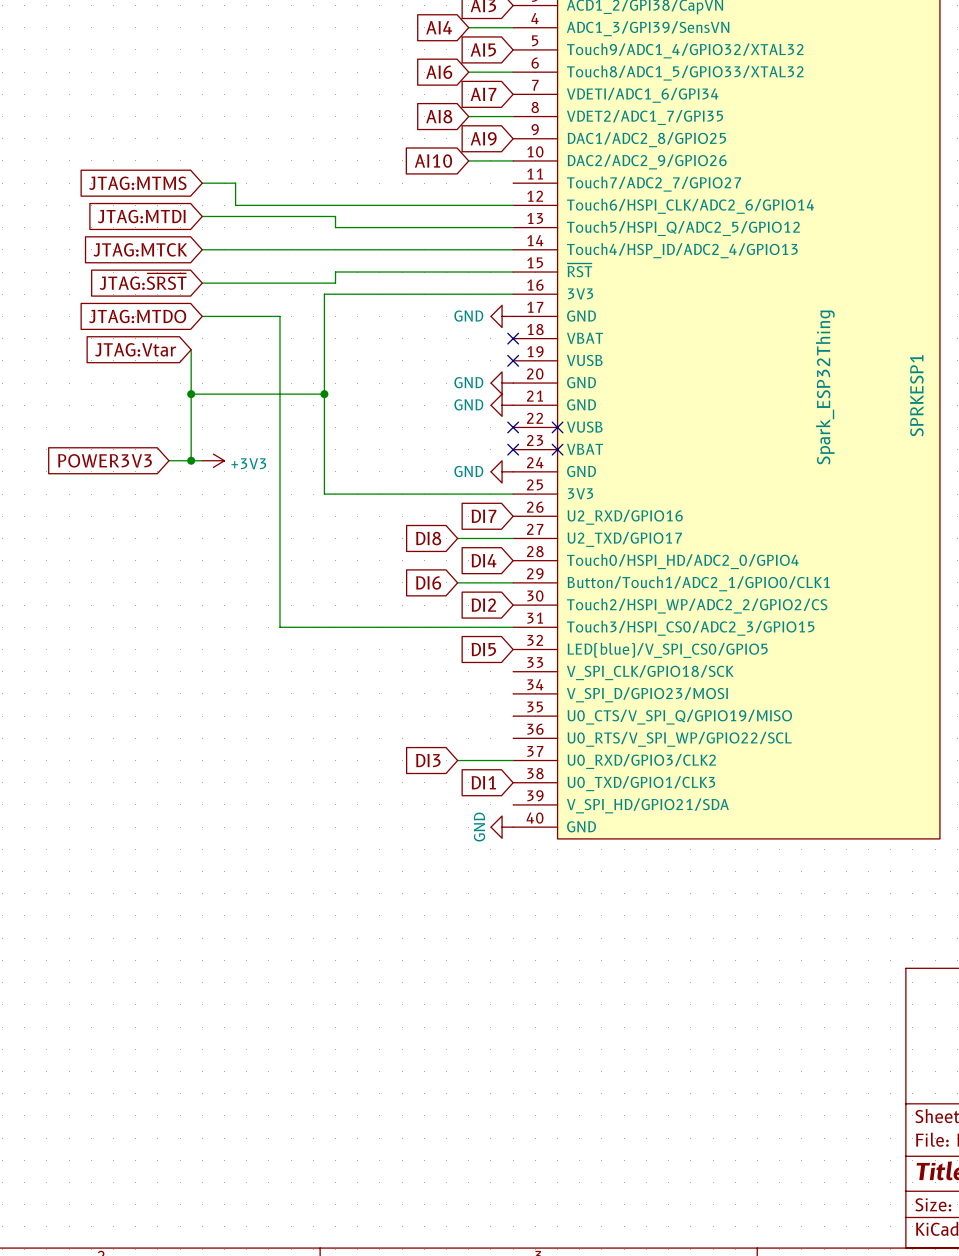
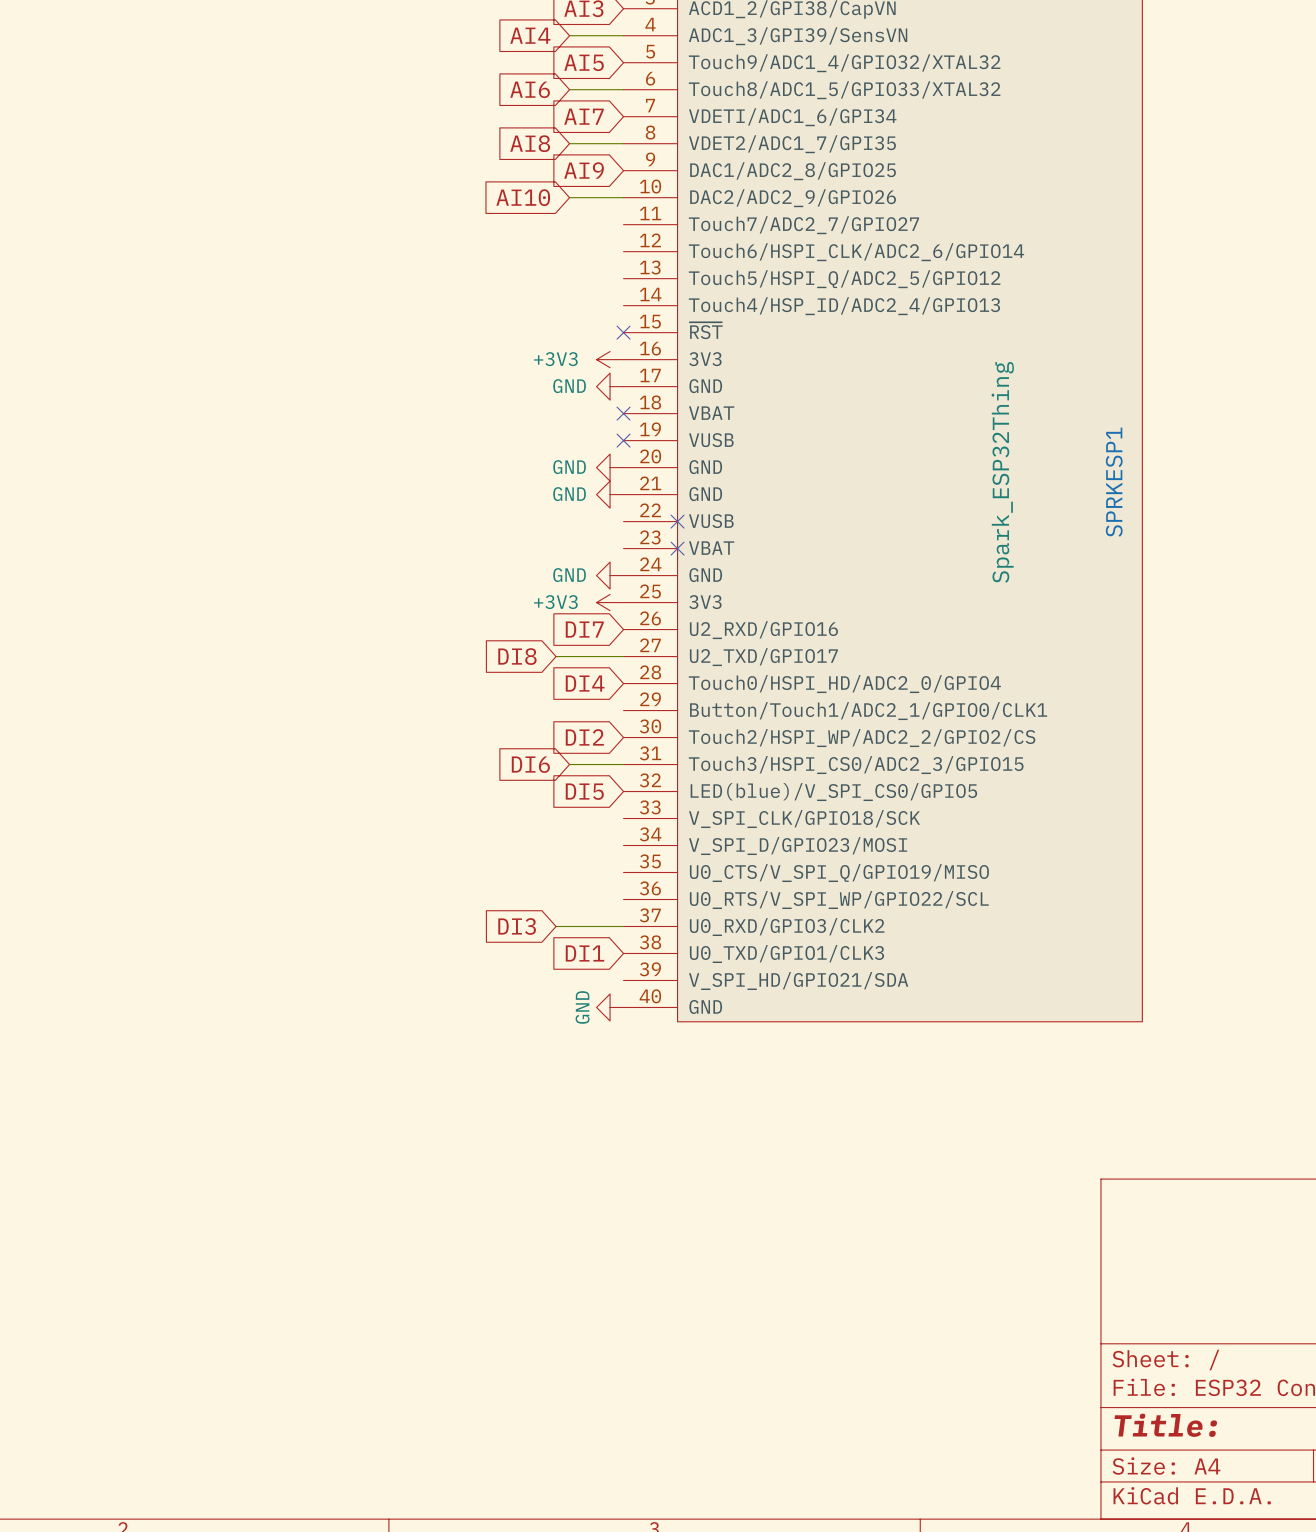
global label: JTAG:MTMS (137, 183) -> none
wire: (202, 183) (235, 183) (235, 205) (513, 205) -> none
global label: JTAG:MTDI (141, 216) -> none
wire: (202, 216) (335, 216) (335, 227) (513, 227) -> none
global label: JTAG:MTCK (140, 249) -> none
wire: (202, 249) (513, 249) -> none
wire: (513, 272) (335, 272) (335, 283) (202, 283) -> none
no-connect mark: none -> (623, 332)
global label: JTAG:~{SRST} (143, 281) -> none
power symbol: none -> +3V3 (610, 359)
wire: (513, 294) (324, 294) (324, 494) (513, 494) -> none
global label: JTAG:MTDO (137, 316) -> none
wire: (202, 316) (279, 316) (279, 627) (468, 627) -> none
global label: JTAG:Vtar (135, 349) -> none
wire: (191, 349) (191, 460) -> none
wire: (191, 394) (324, 394) -> none
junction: (191, 394) -> none
junction: (324, 394) -> none
no-connect mark: (513, 427) -> none
no-connect mark: (513, 449) -> none
global label: POWER3V3 (104, 460) -> none
wire: (168, 460) (202, 460) -> none
junction: (191, 460) -> none
power symbol: +3V3 (213, 460) -> none
power symbol: none -> +3V3 (610, 602)
global label position: DI6 (428, 582) -> DI6 (530, 764)
wire: (457, 582) (513, 582) -> none

